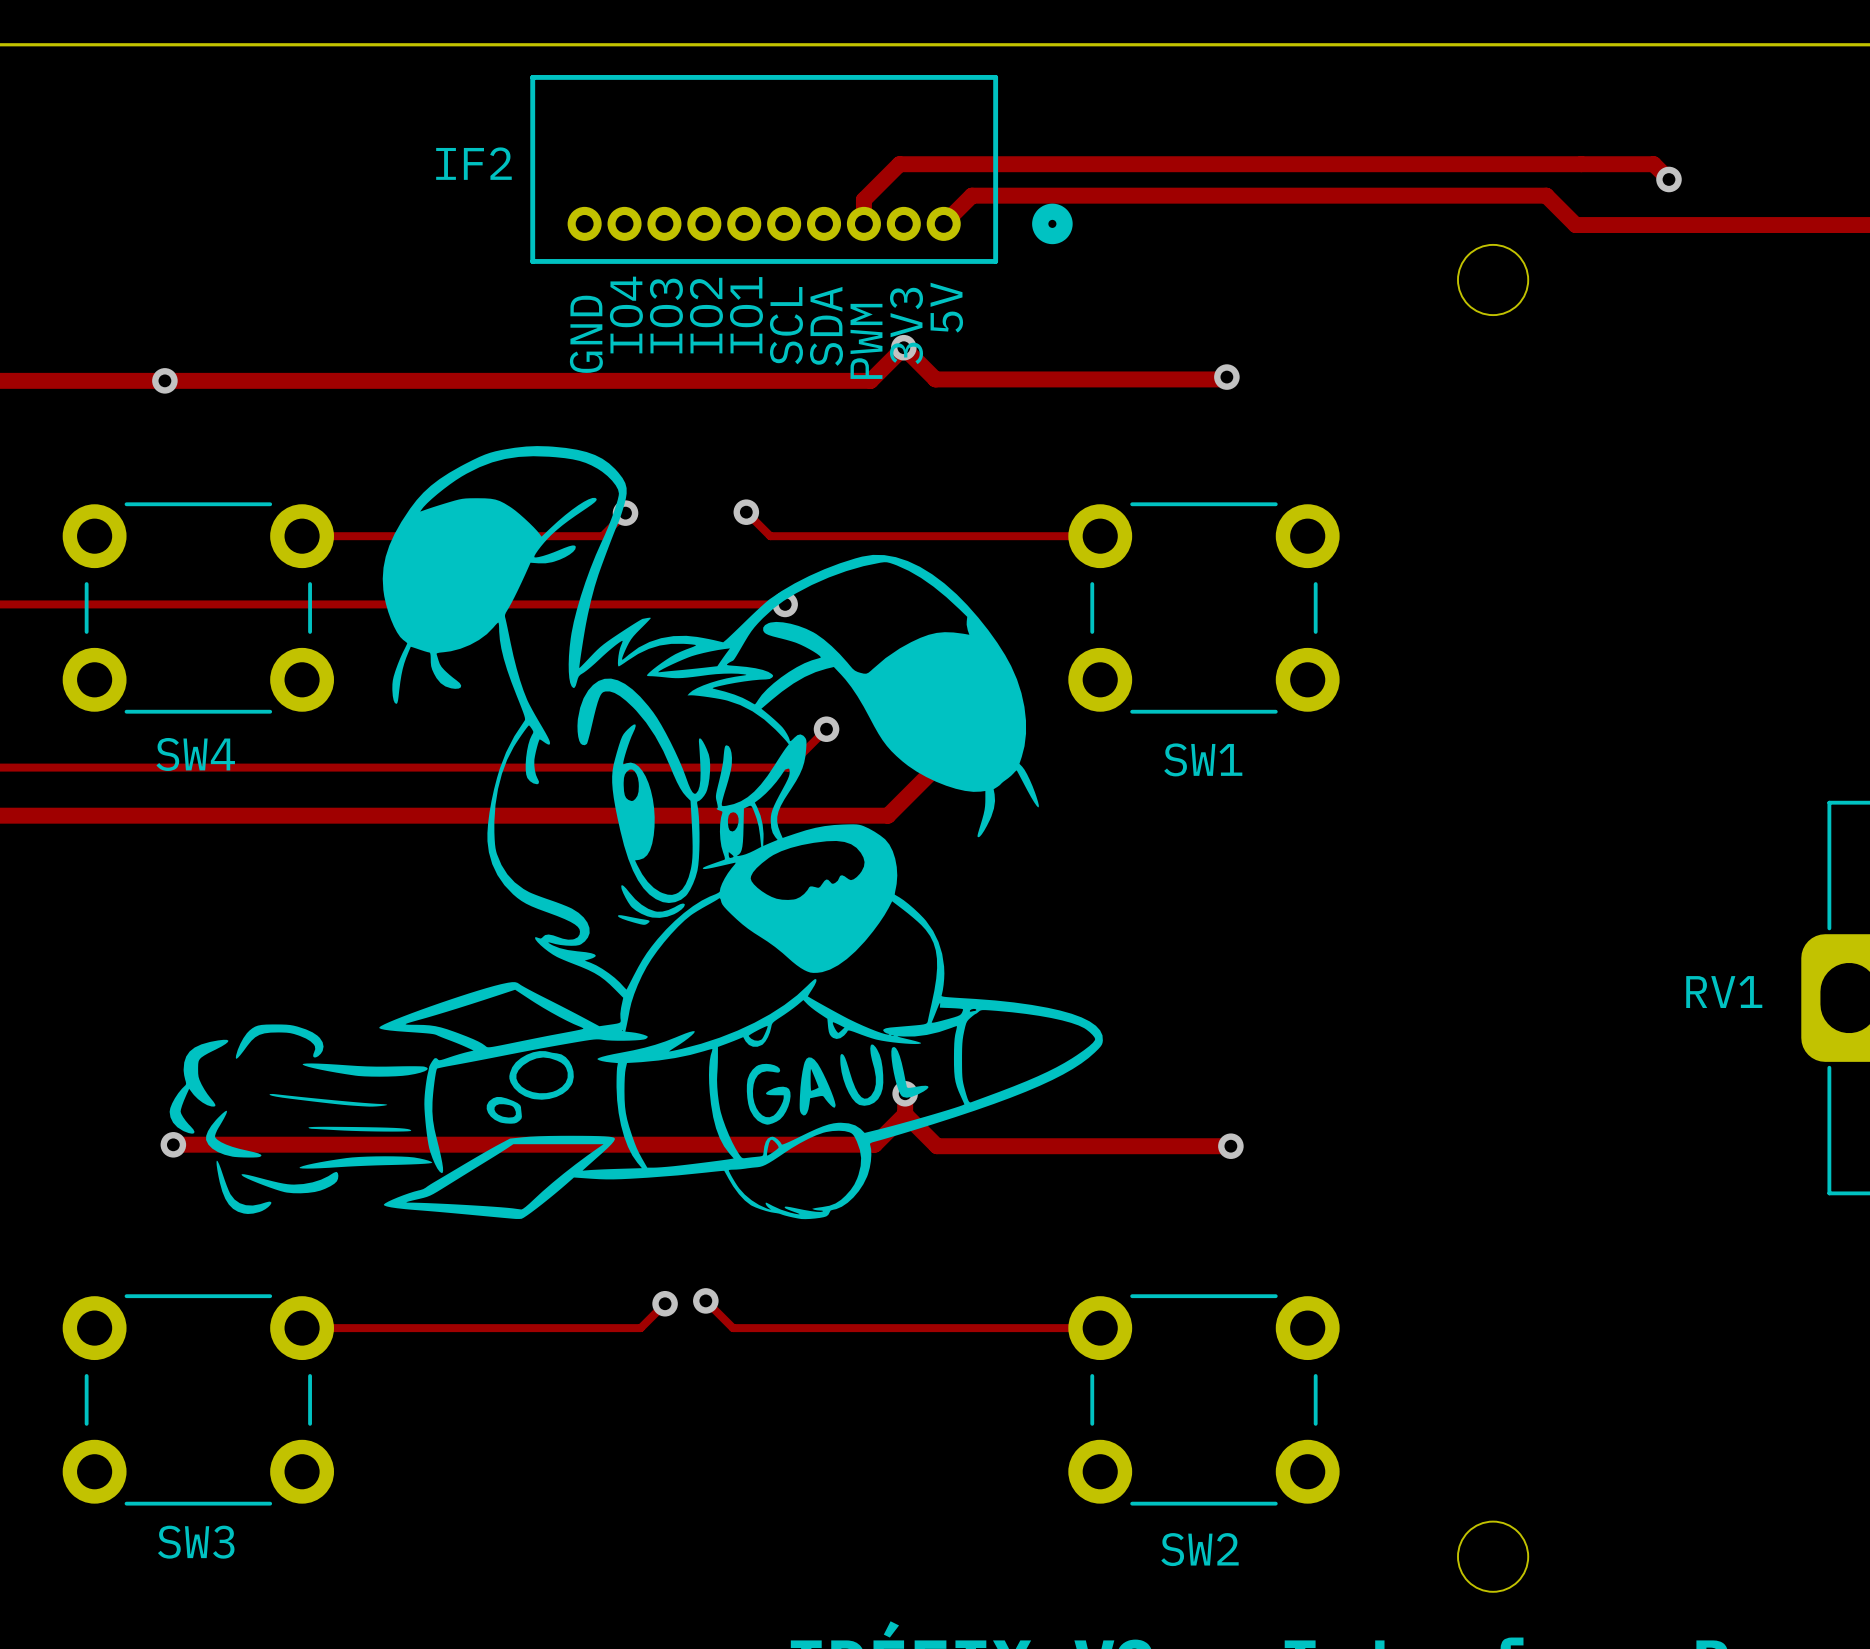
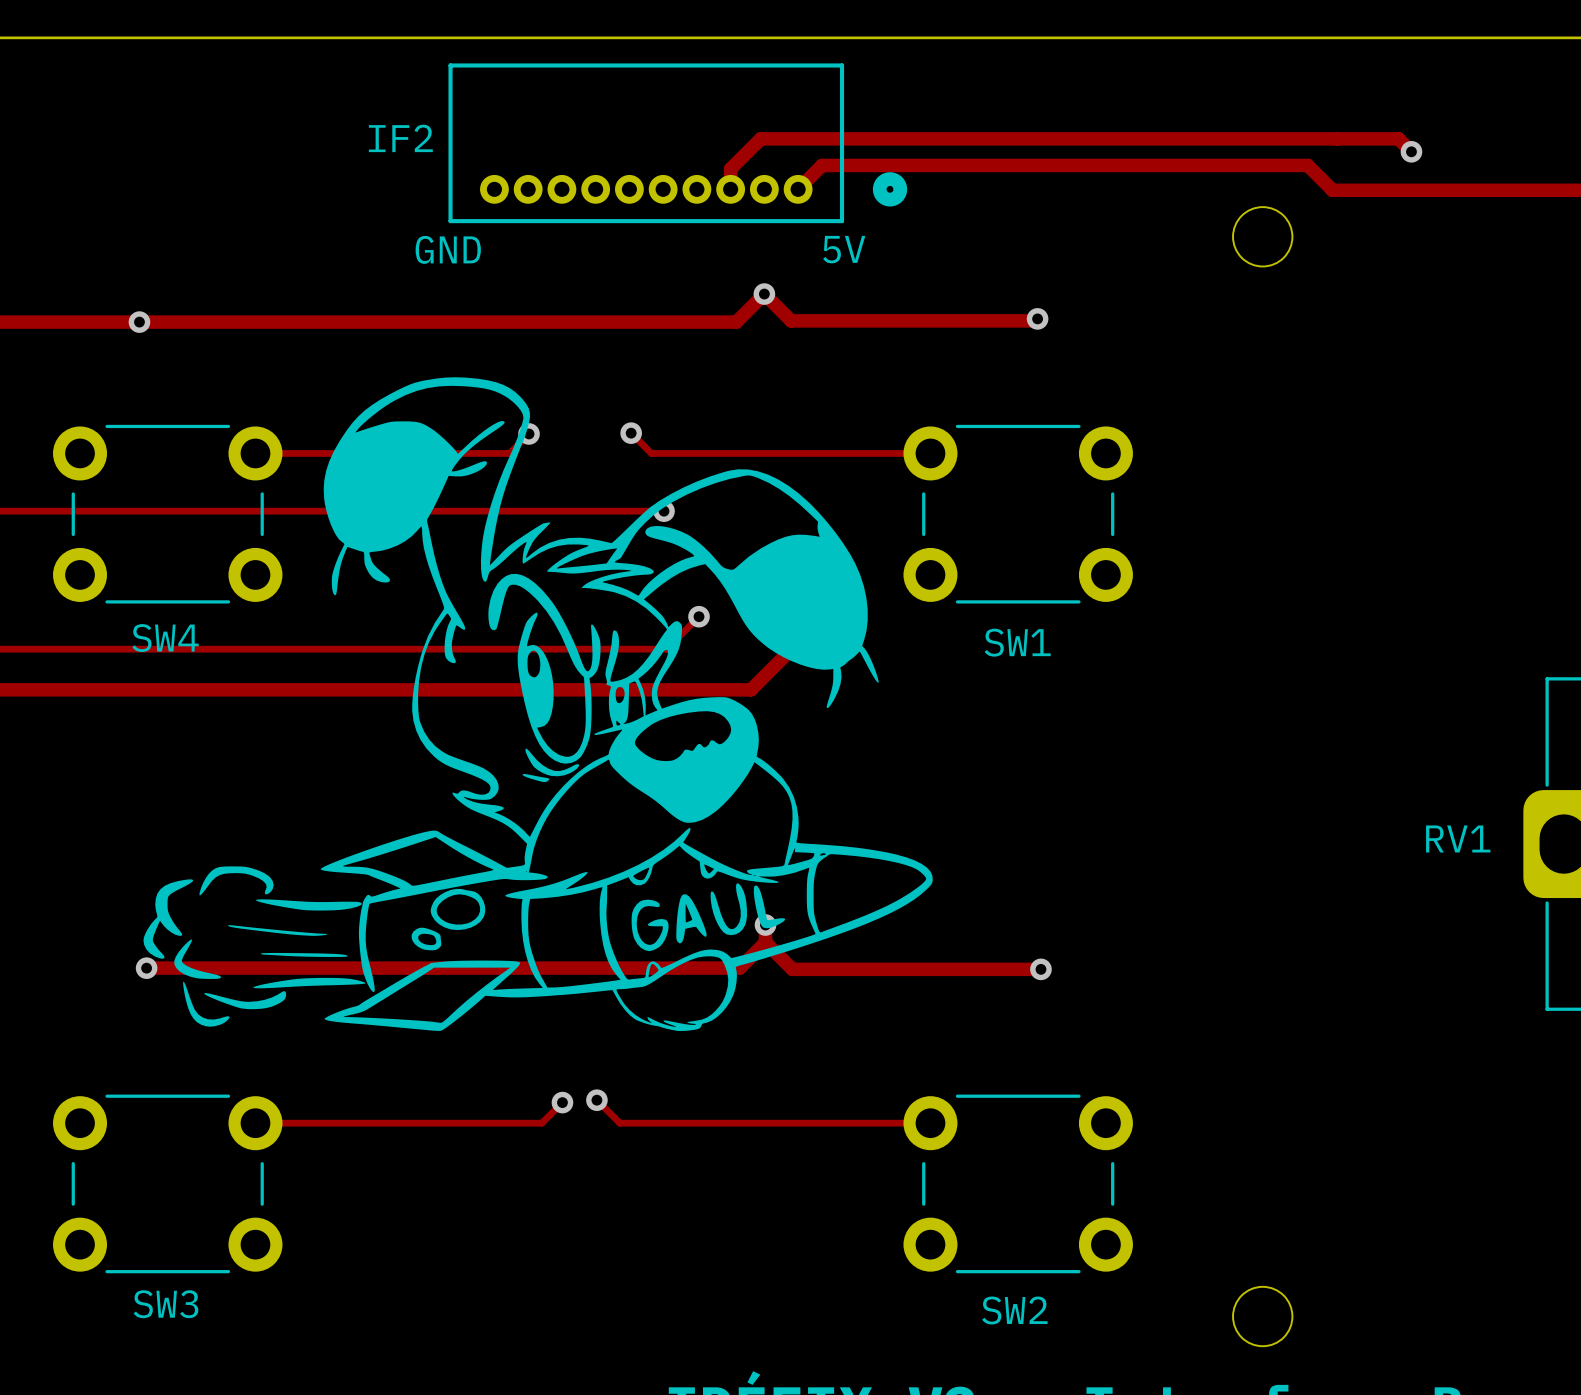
text rotation: 0° (946, 307) -> 90° clockwise (844, 249)
text: IO4 (626, 315) -> none
text: IO2 (706, 315) -> none
text: IO1 (746, 315) -> none
text: IO3 (666, 316) -> none
text: SCL (786, 325) -> none
text: 3V3 (906, 325) -> none
text: SDA (826, 326) -> none
text rotation: 0° (586, 334) -> 90° clockwise (448, 249)
text: PWM (866, 341) -> none

